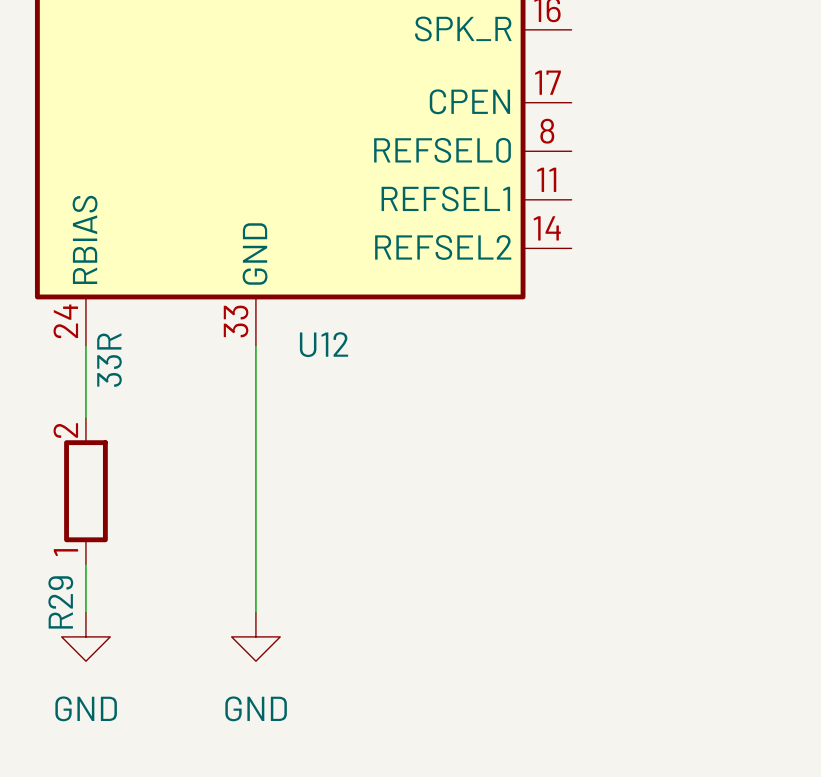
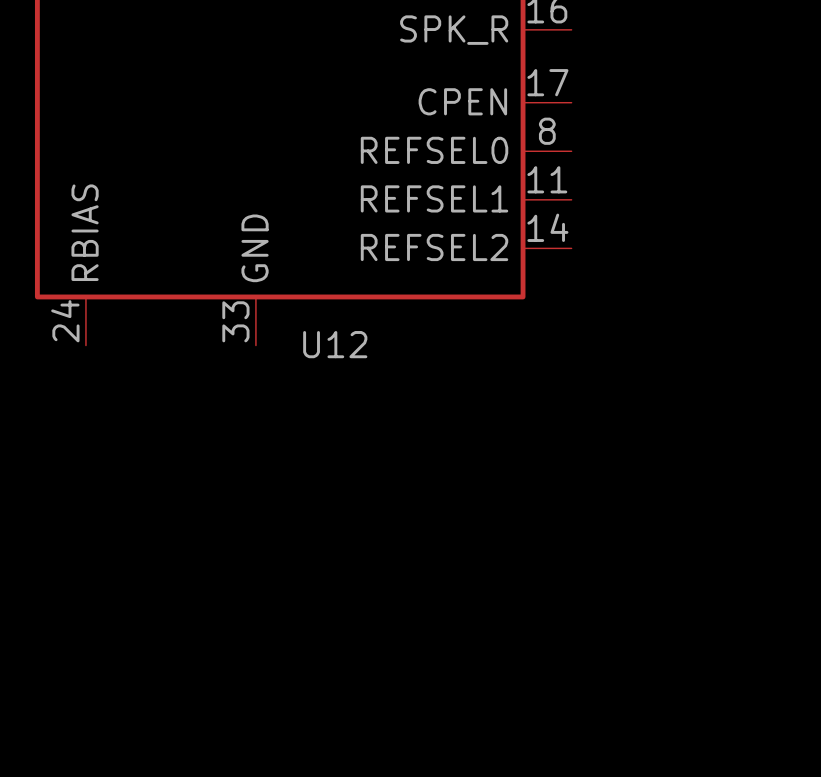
wire: (85, 345) (85, 418) -> none
wire: (255, 345) (255, 612) -> none
R29: 33R (85, 491) -> none
wire: (85, 564) (85, 612) -> none
power symbol: GND (85, 636) -> none
power symbol: GND (255, 636) -> none

